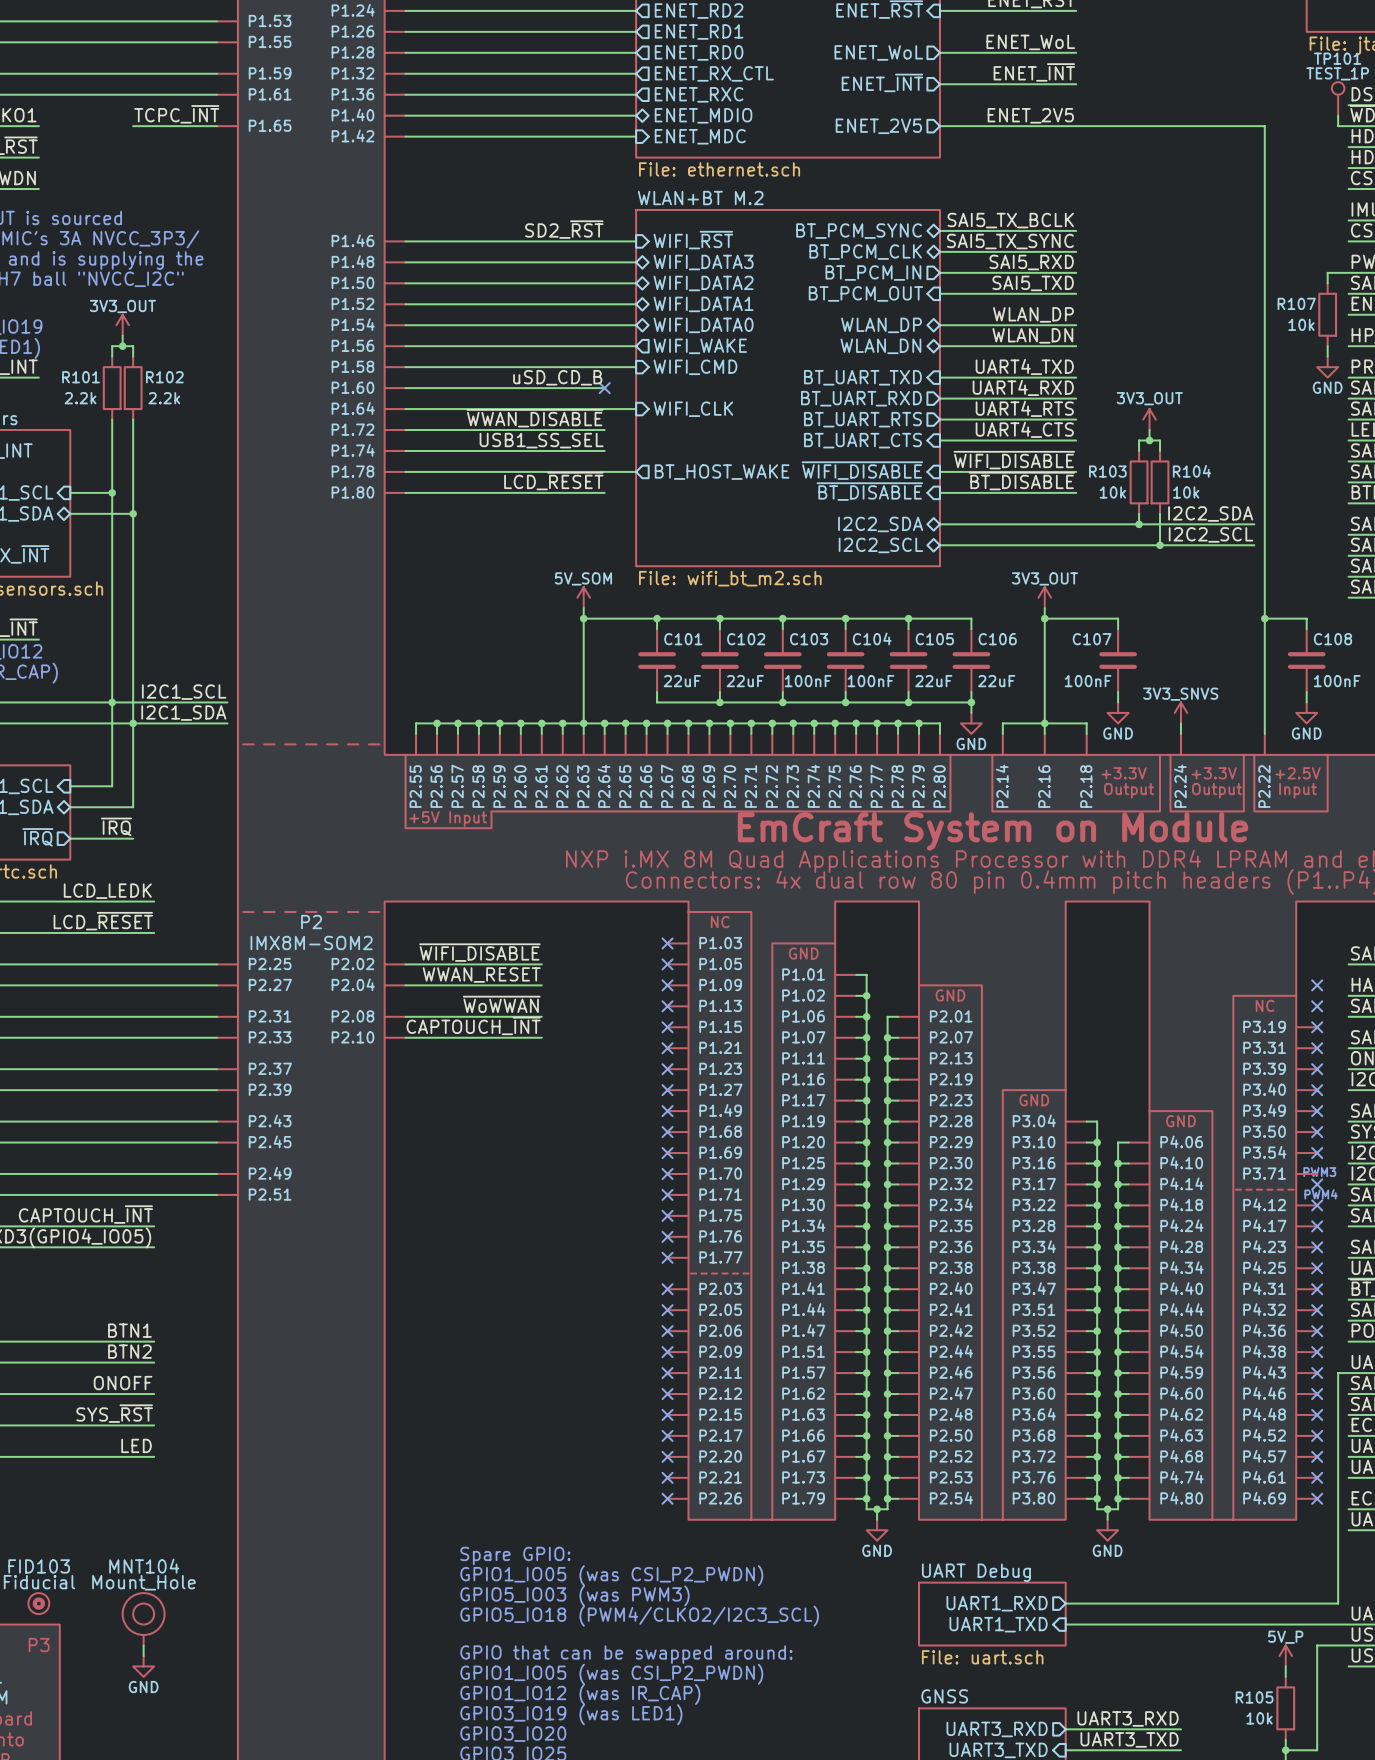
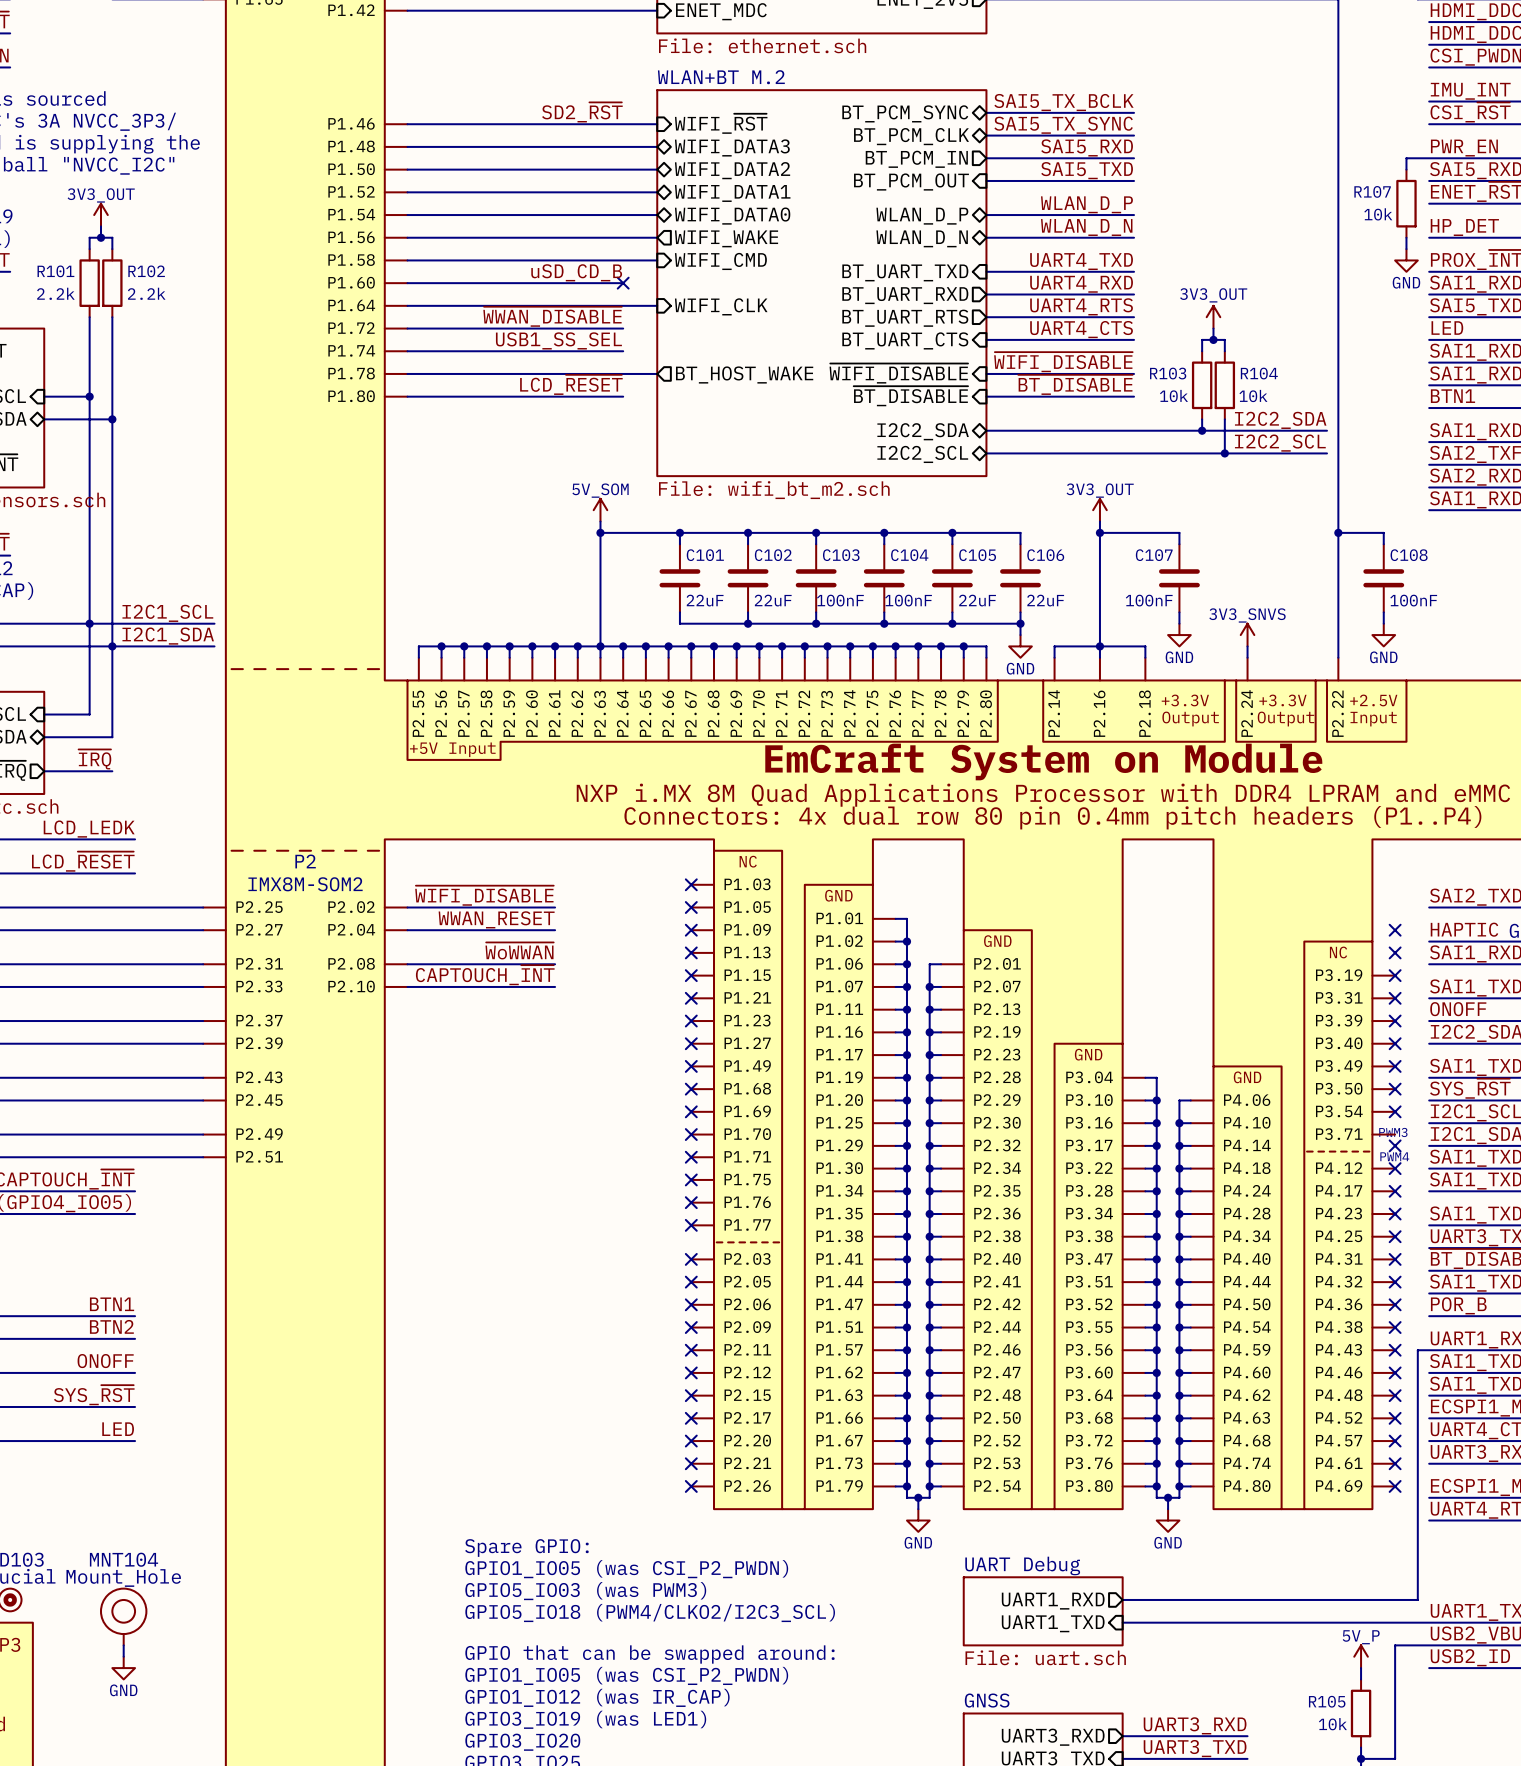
label: WLAN_DP (1033, 314) -> WLAN_D_P (1086, 204)
sheet pin: WLAN_DP (881, 325) -> WLAN_D_P (922, 216)
label: WLAN_DN (1032, 335) -> WLAN_D_N (1086, 227)
sheet pin: WLAN_DN (880, 346) -> WLAN_D_N (922, 238)

